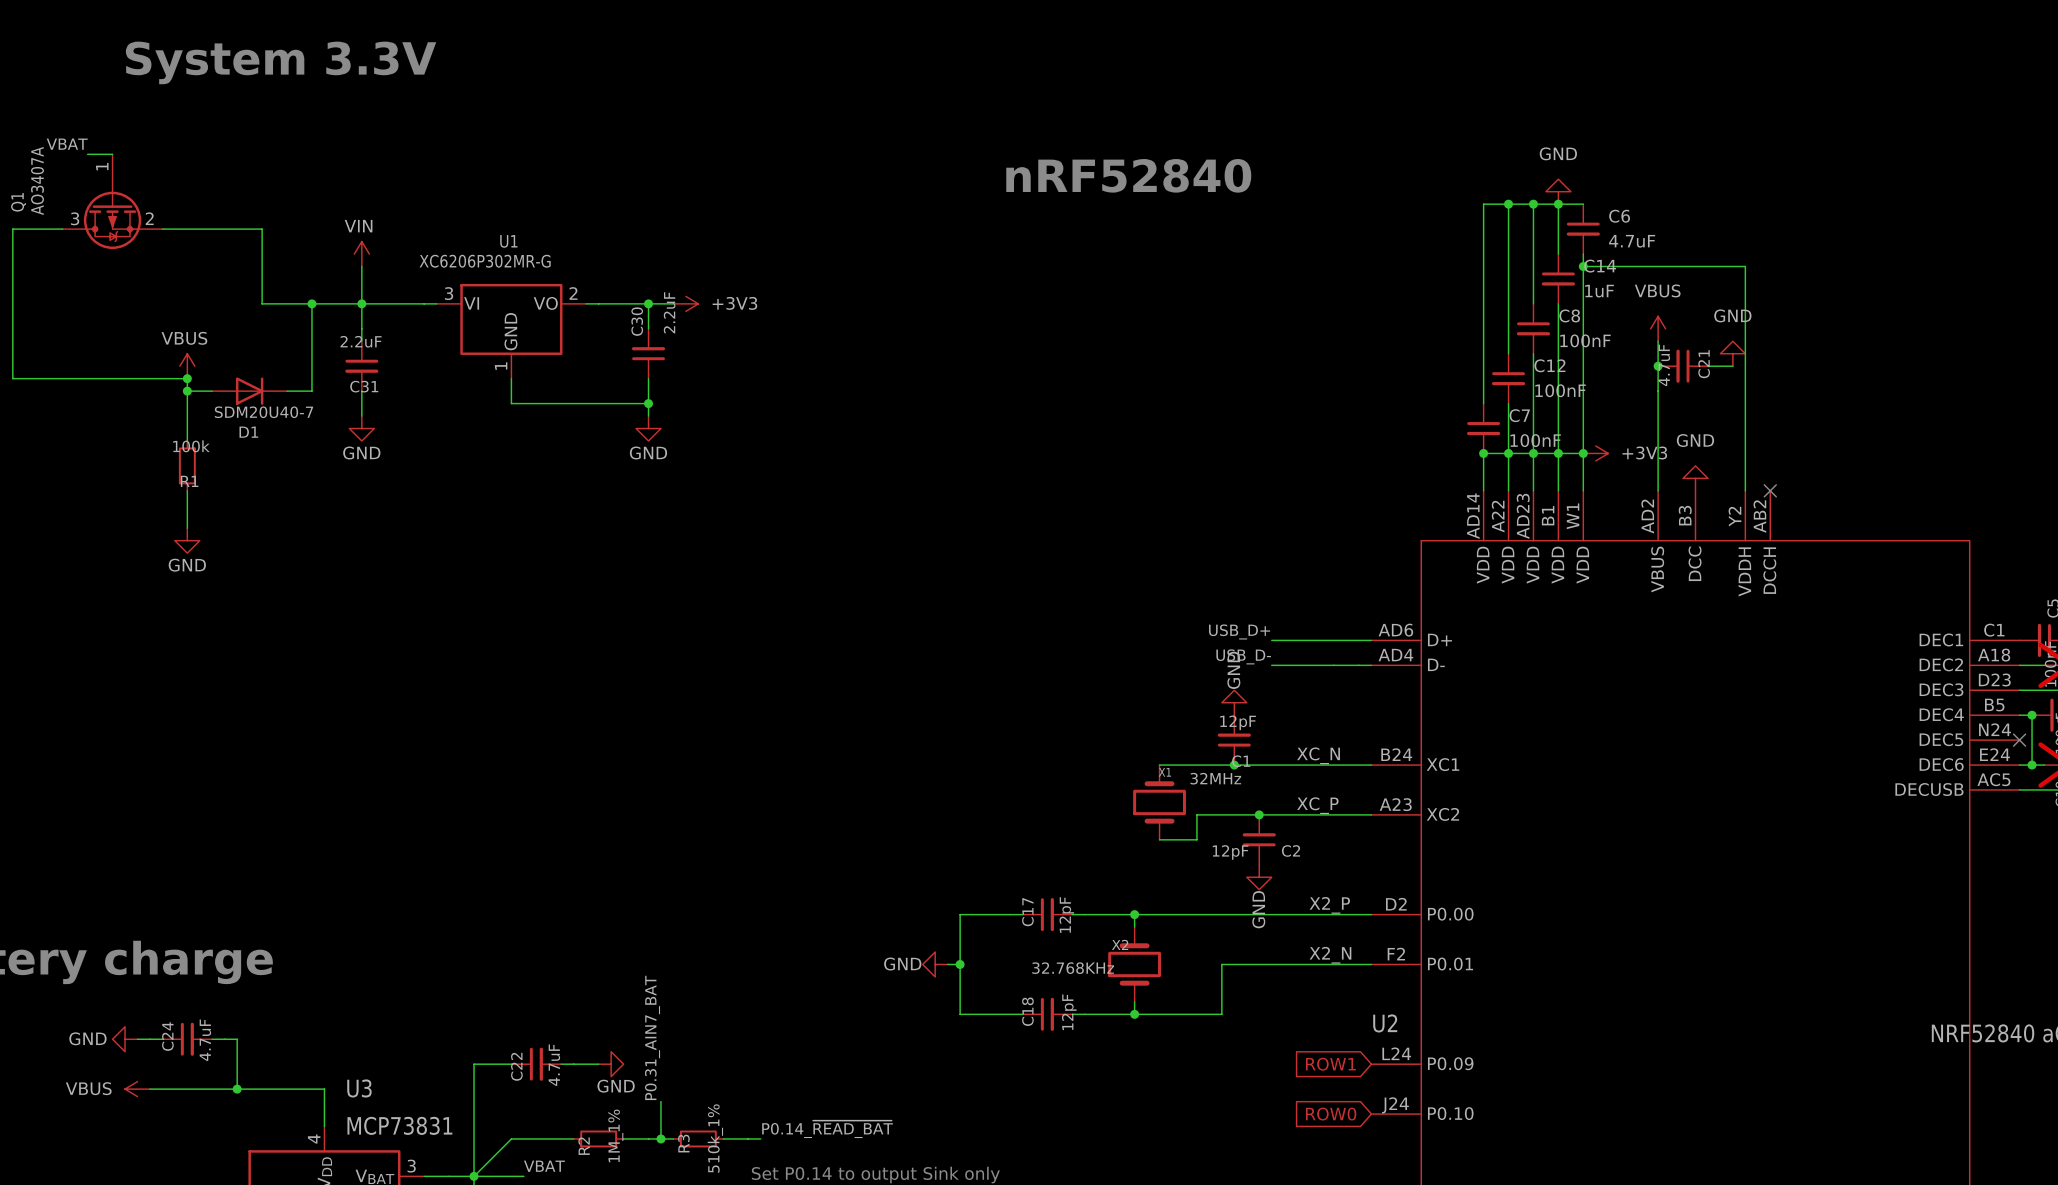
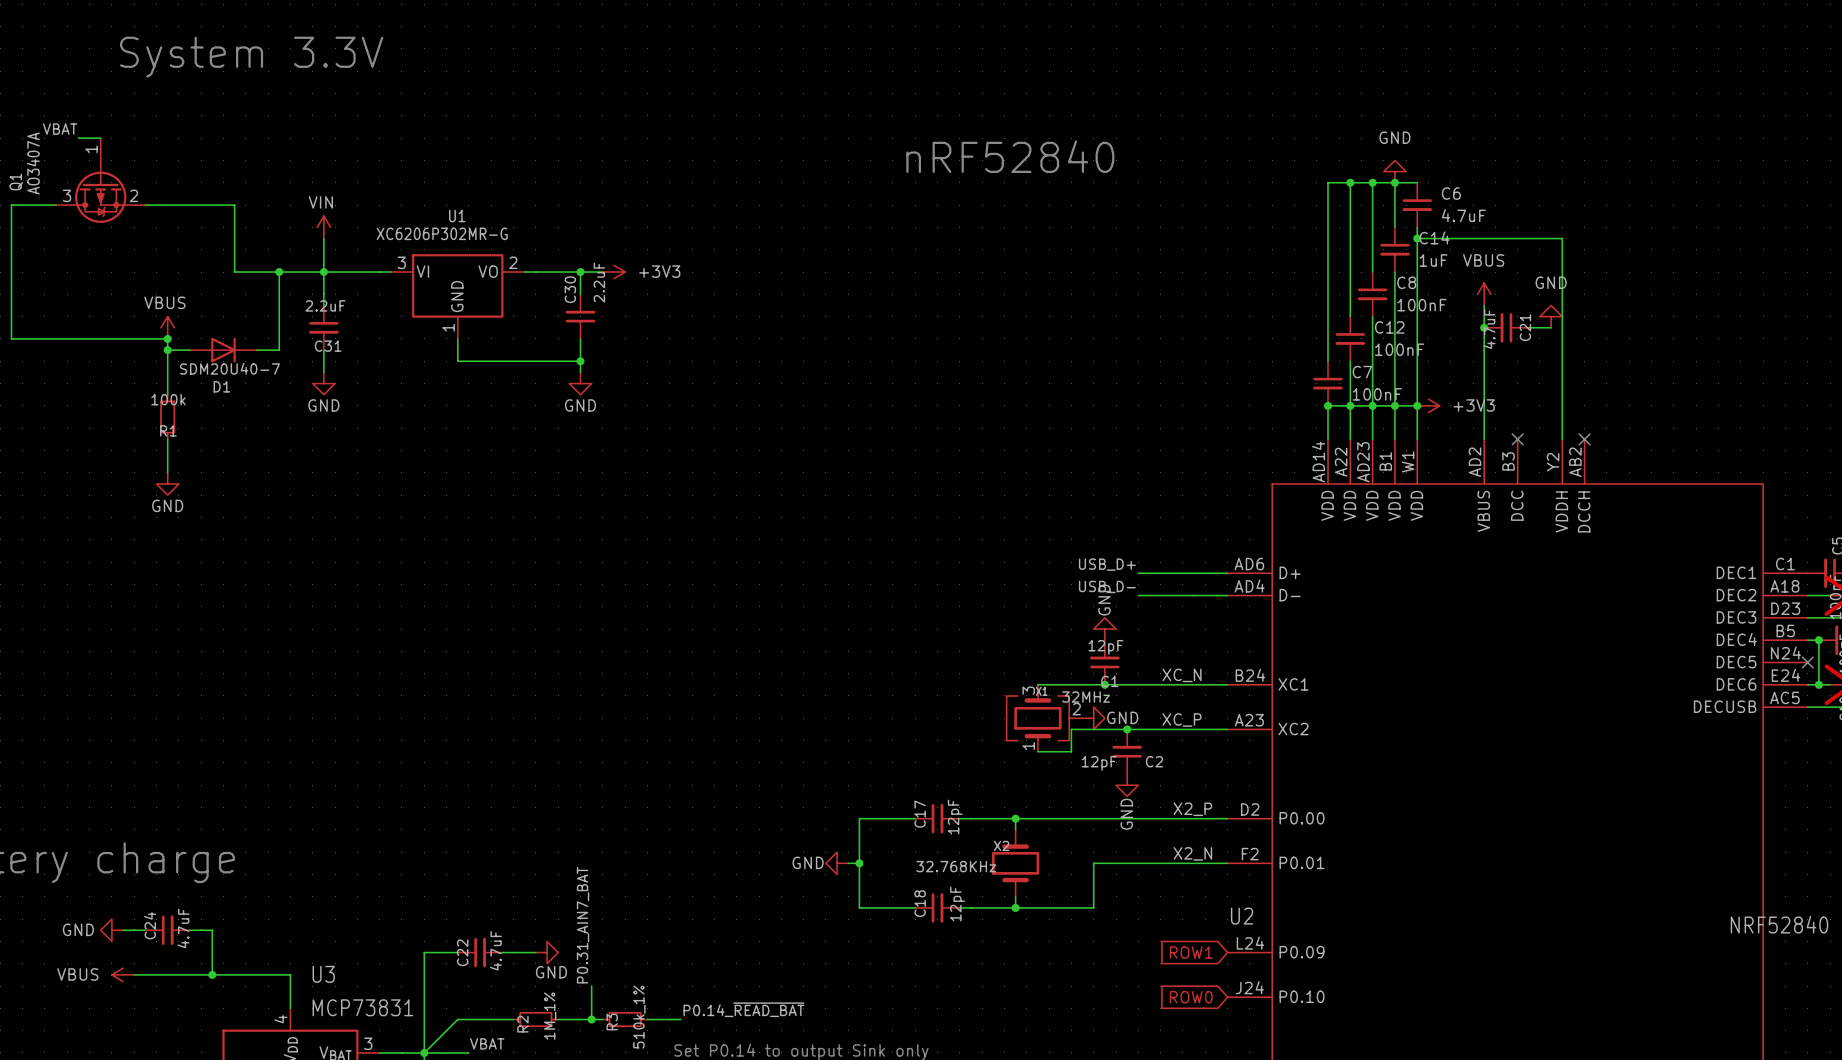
power symbol: GND (1695, 478) -> none
no-connect mark: none -> (1517, 439)
X1 symbol: [1133, 765, 1186, 840] -> [1006, 684, 1083, 752]
power symbol: none -> GND (1093, 718)

